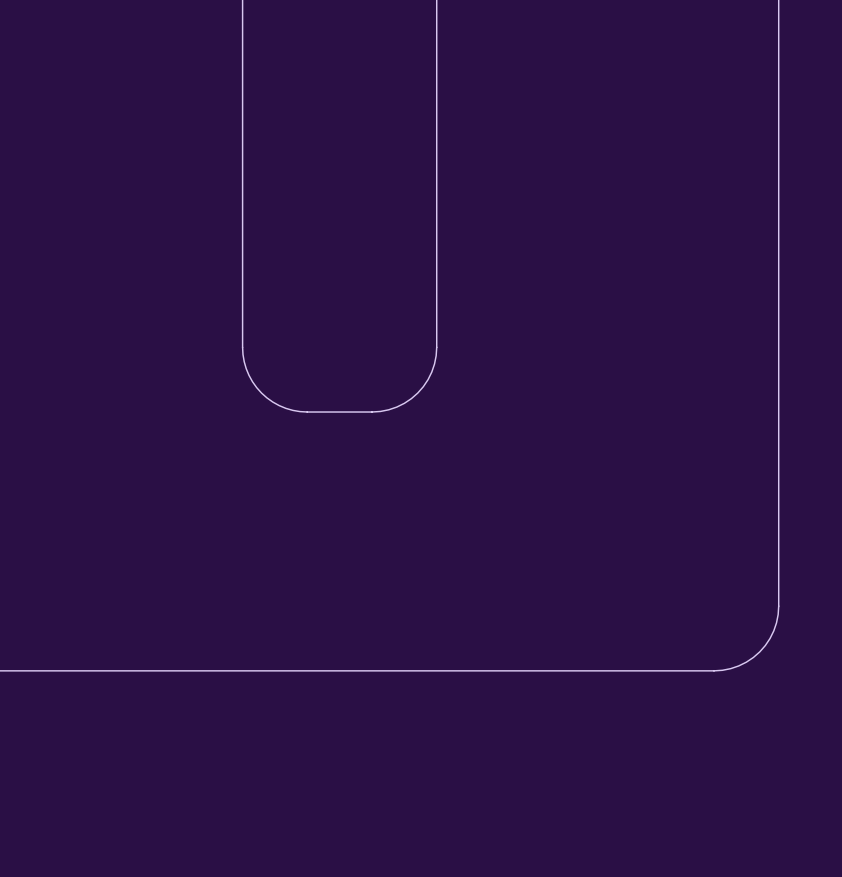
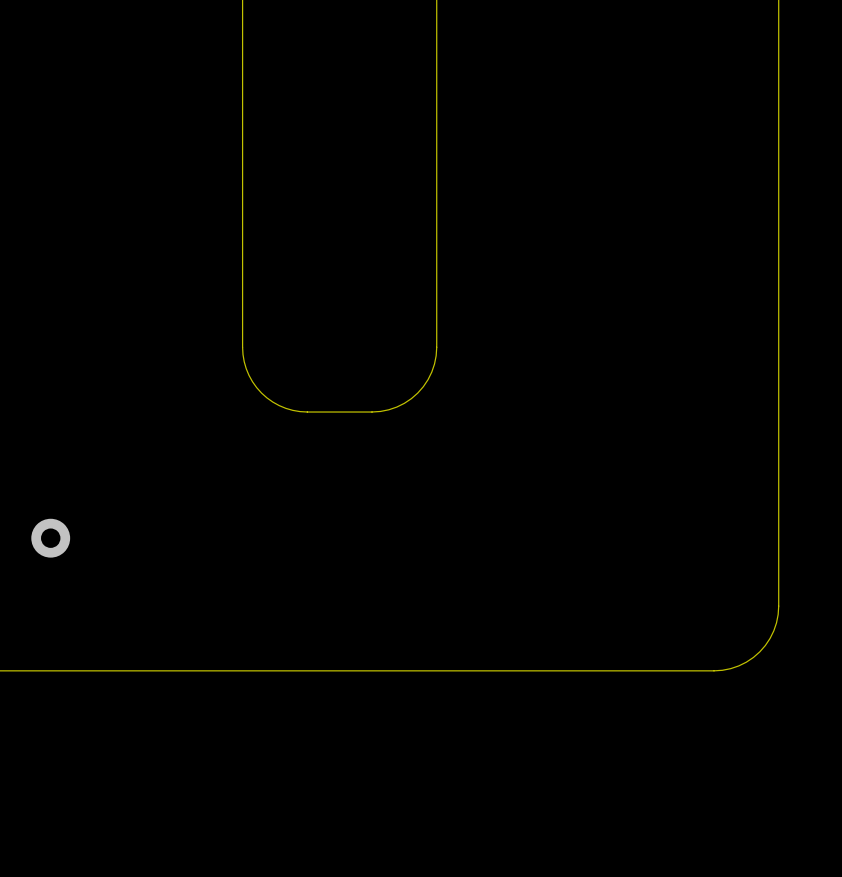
via: none -> (50, 538)

